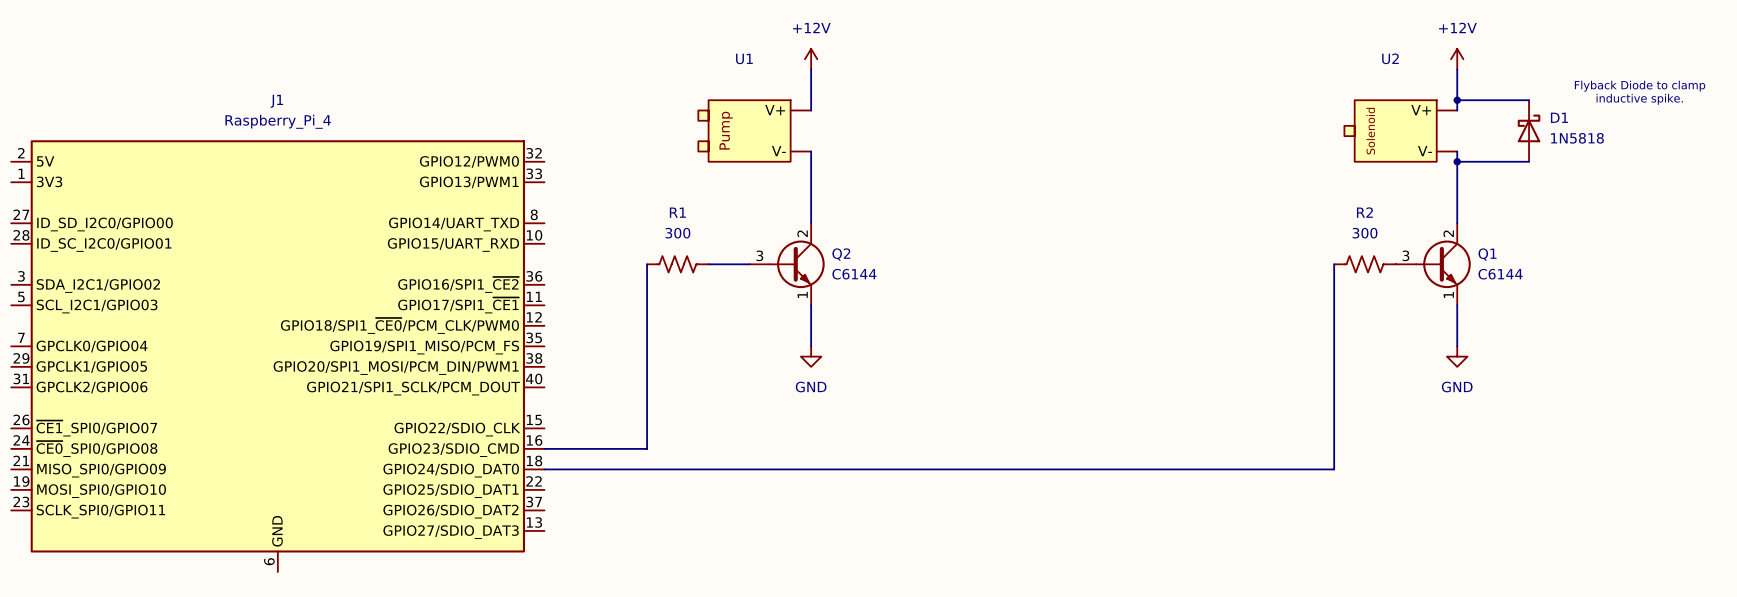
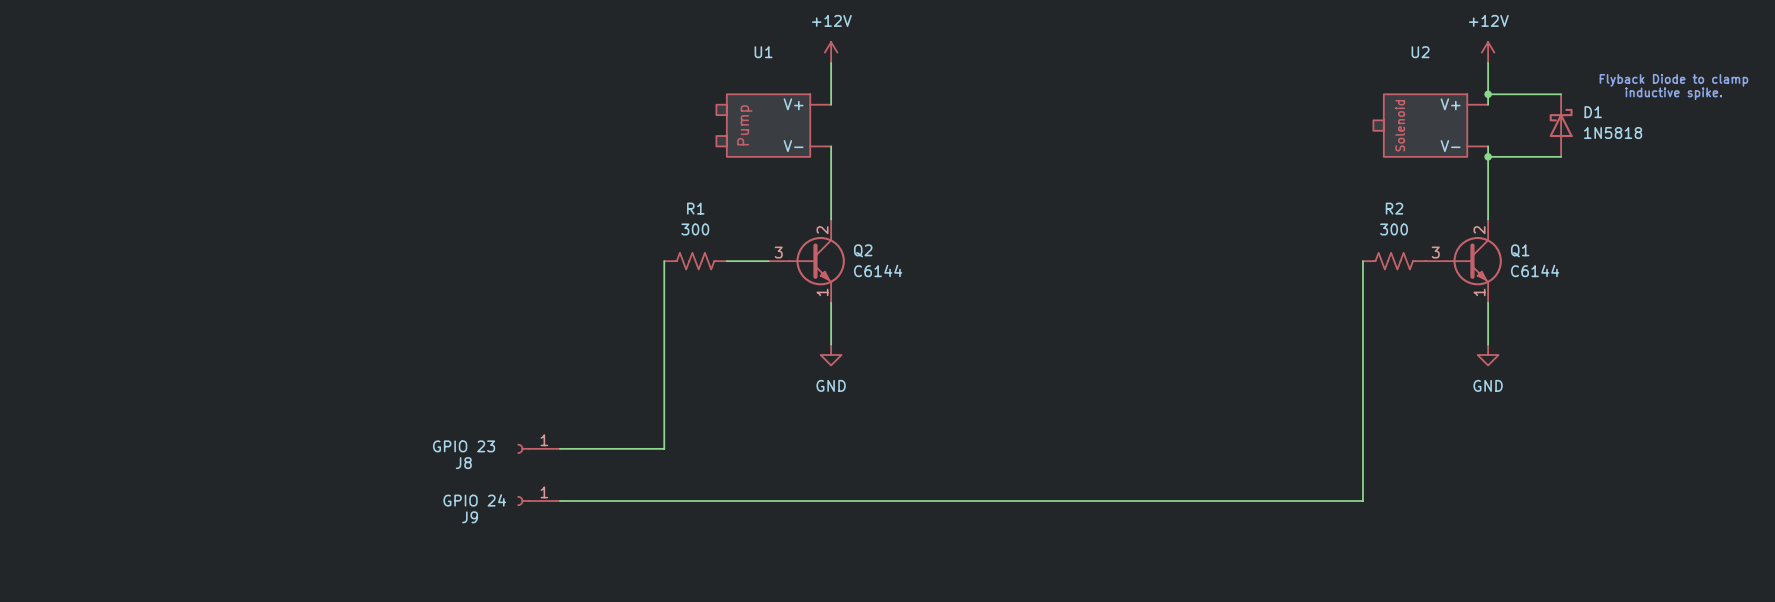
J1: Raspberry_Pi_4 (277, 356) -> none
J8: none -> GPIO 23 (538, 448)
wire: (544, 469) (1334, 469) -> (559, 501) (1362, 501) (1362, 469)
J9: none -> GPIO 24 (538, 501)

